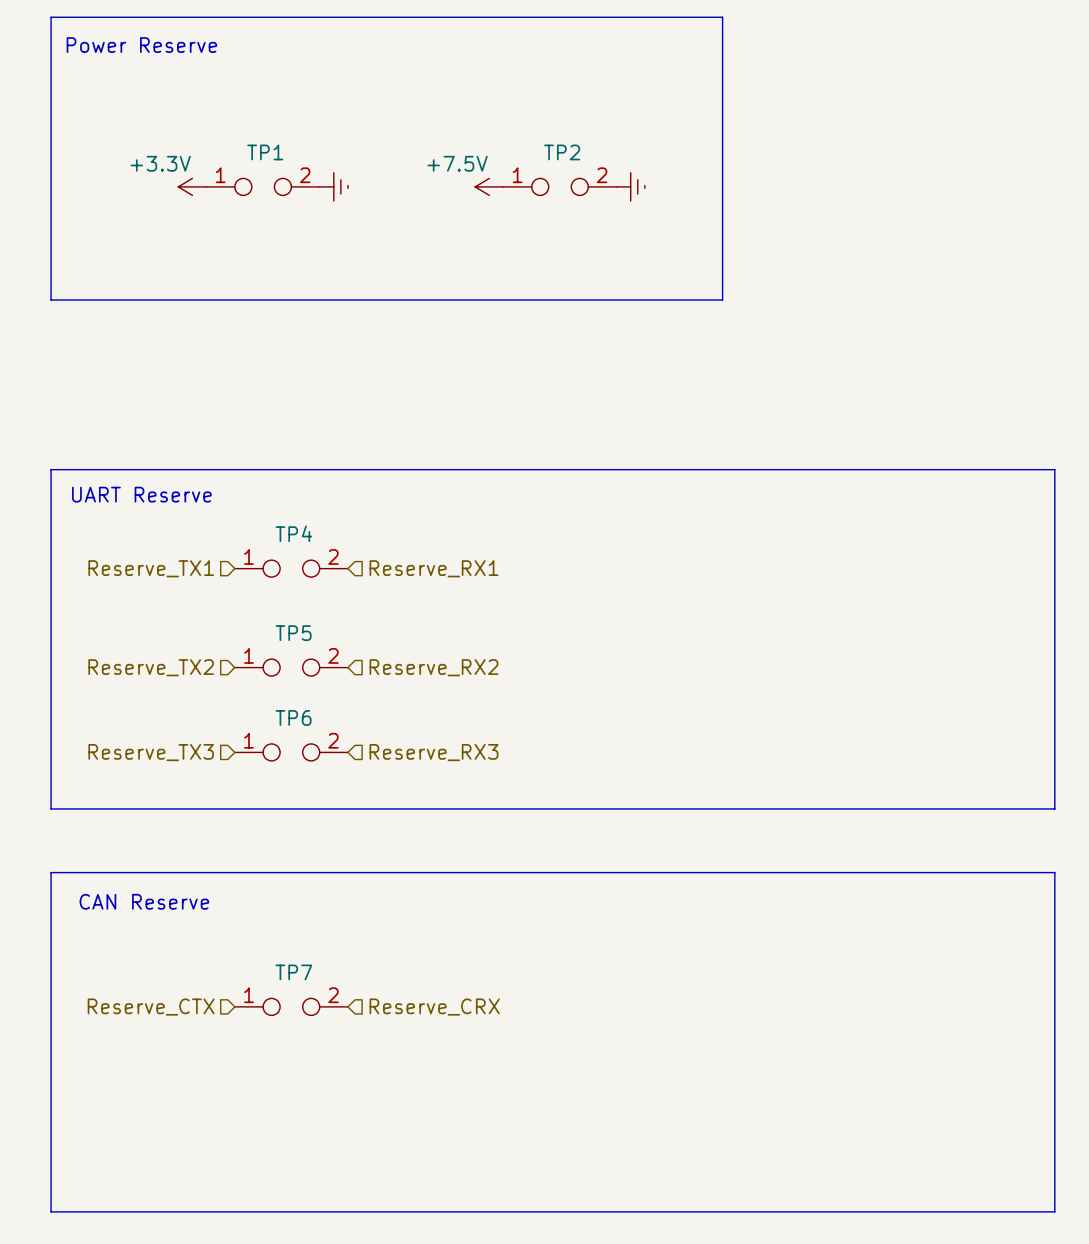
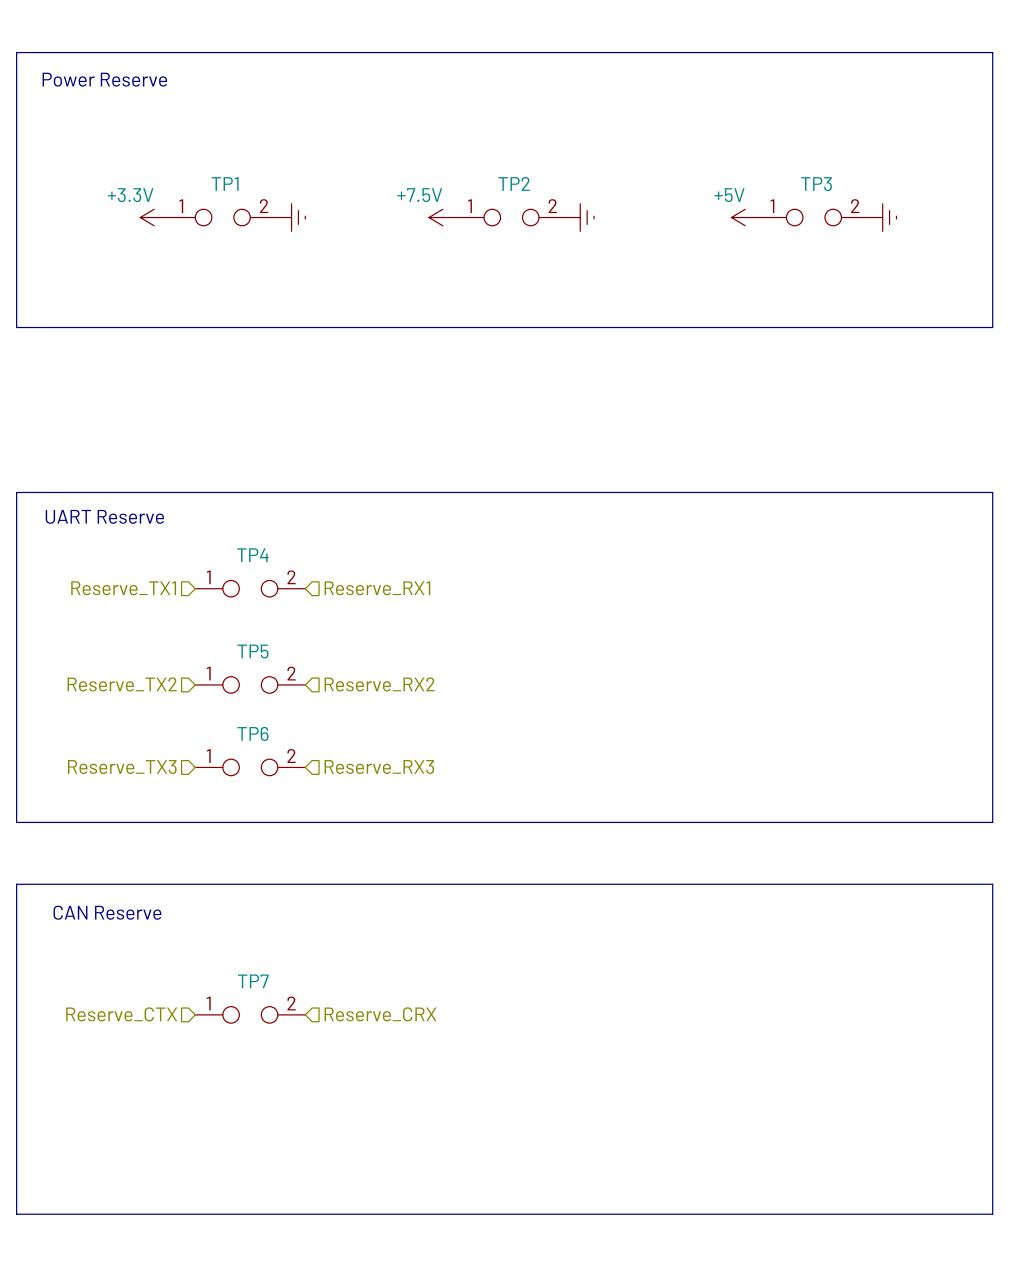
line: (722, 17) (722, 300) -> (669, 52) (992, 52) (992, 327) (669, 327)
power symbol: none -> +5V (745, 217)
TP3: none -> (813, 217)
power symbol: none -> (882, 217)

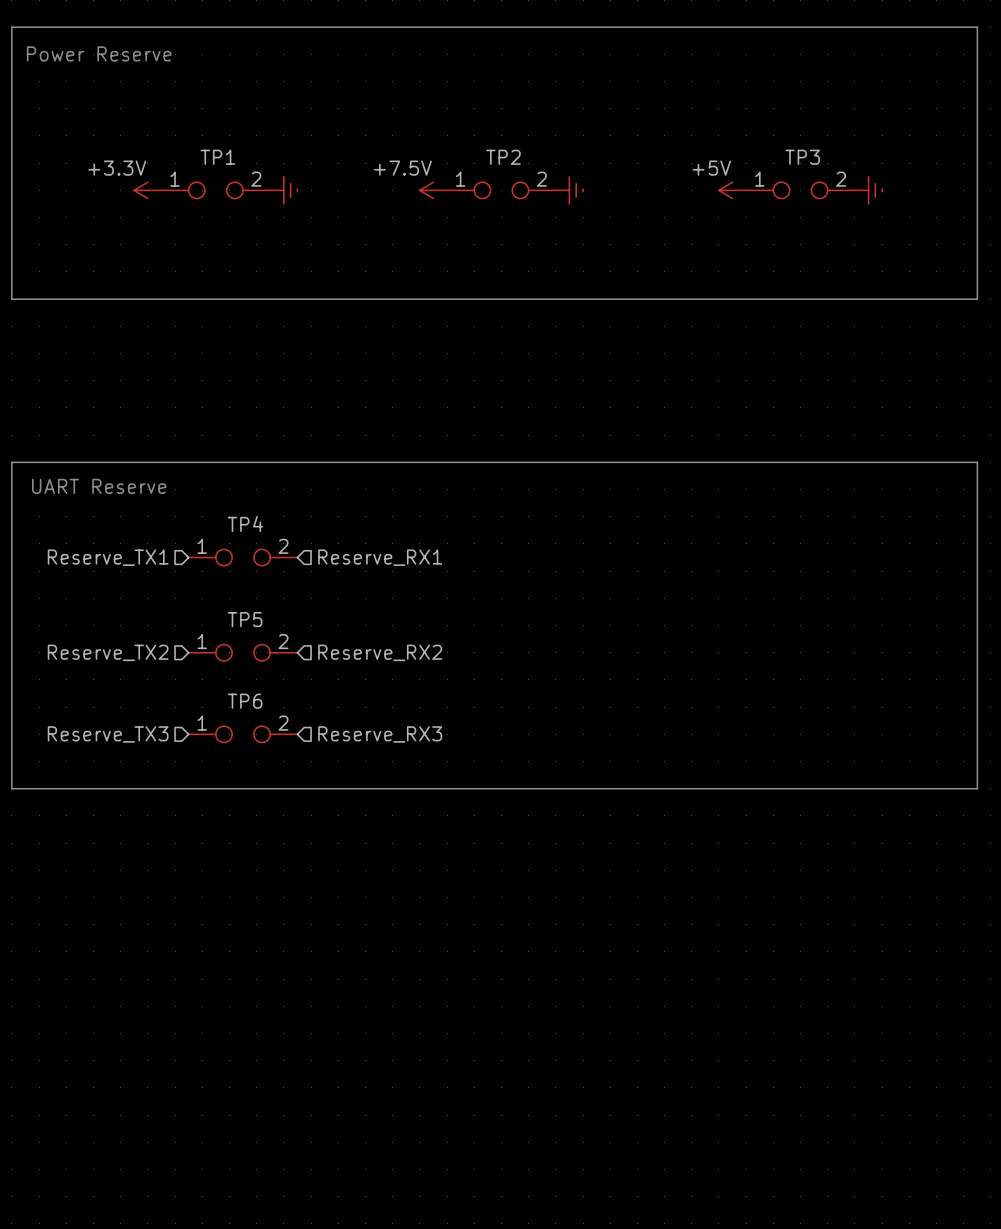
line: (16, 884) (992, 884) (992, 1214) (16, 1214) (16, 884) -> none
text: CAN Reserve (107, 912) -> none
hierarchical label: Reserve_CTX (121, 1014) -> none
TP7: (250, 1014) -> none
hierarchical label: Reserve_CRX (380, 1014) -> none

